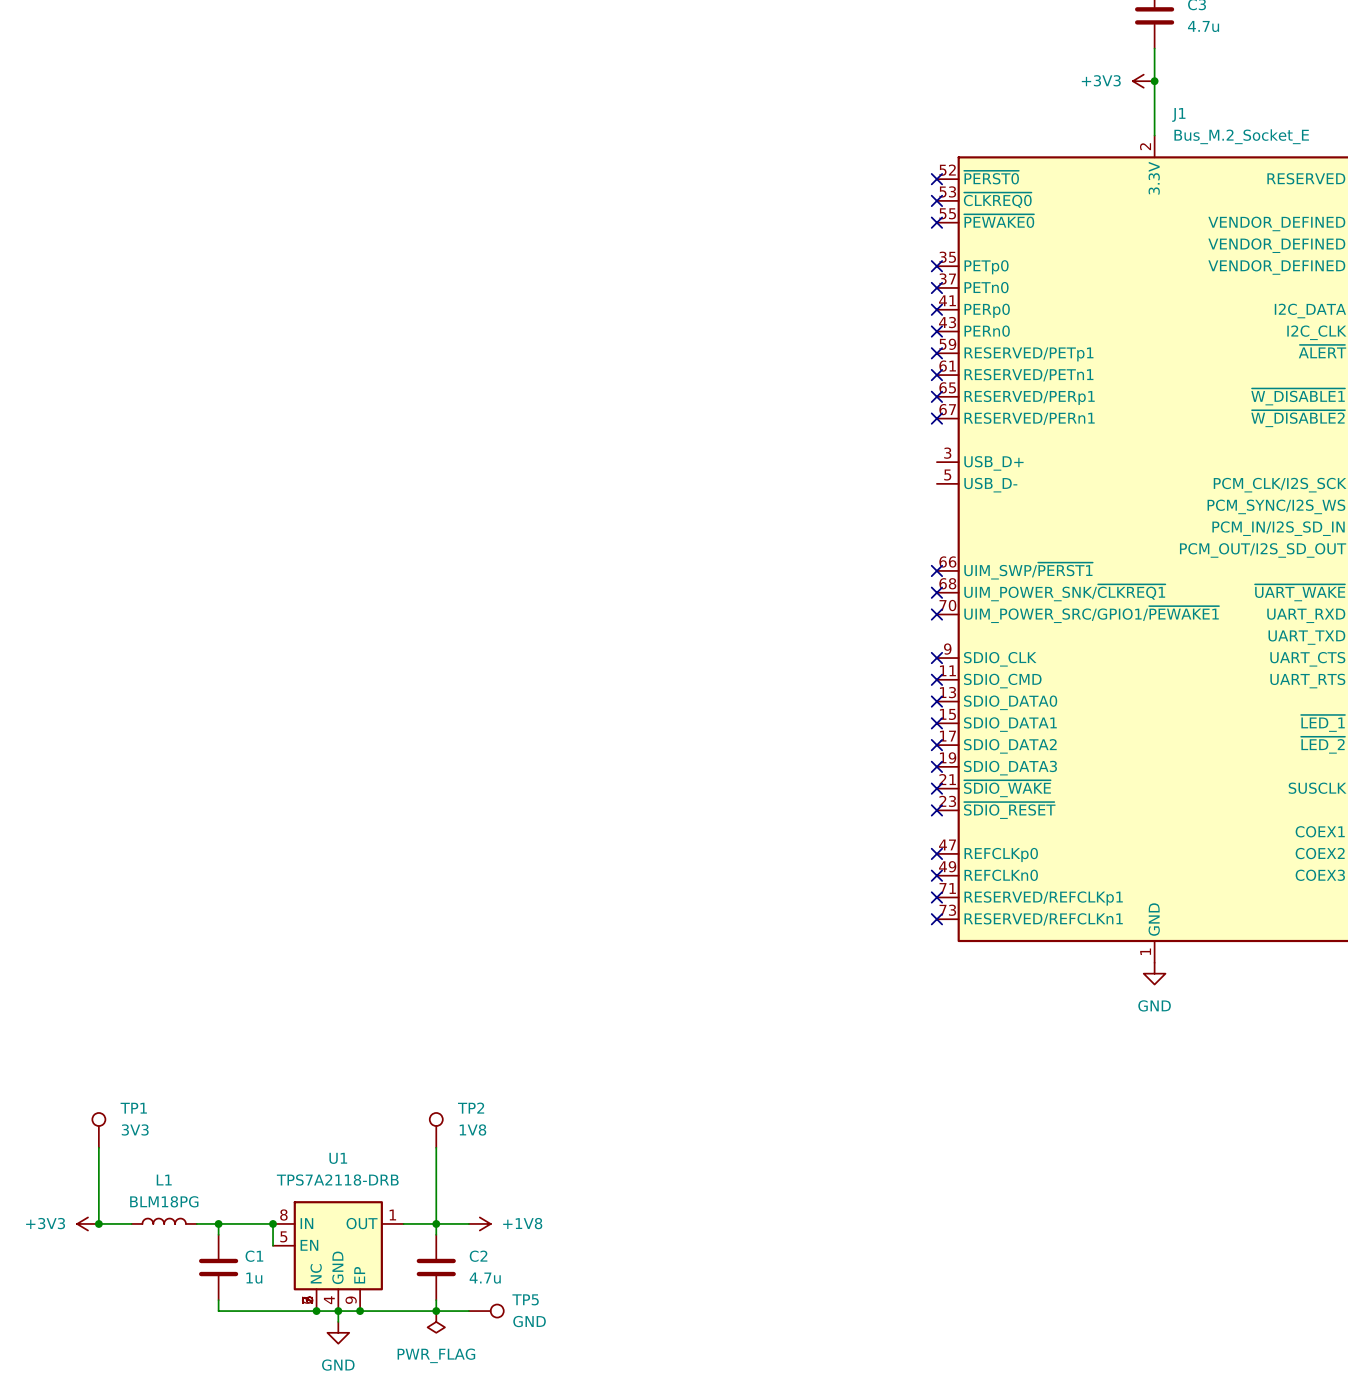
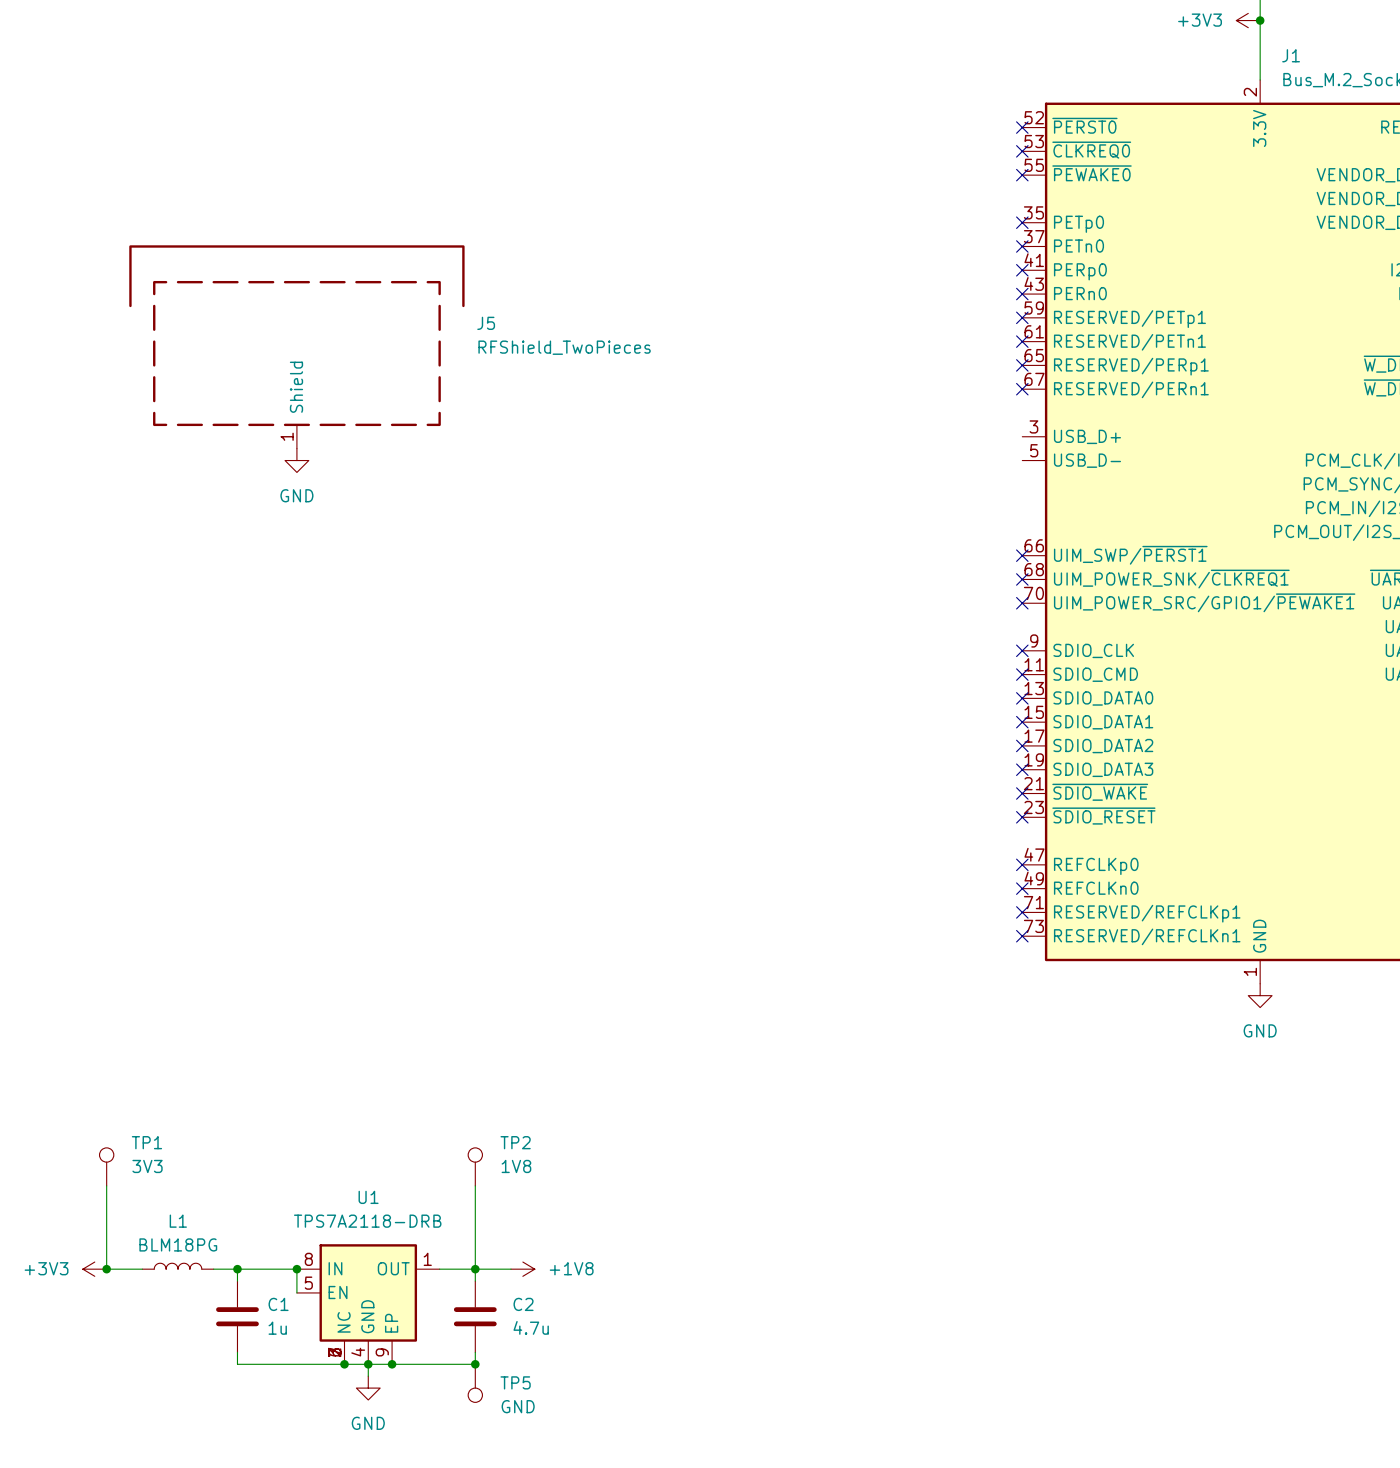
J5: none -> RFShield_TwoPieces (296, 346)
power symbol: none -> GND (296, 460)
wire: (436, 1311) (468, 1311) -> none
TP5 position: (486, 1311) -> (475, 1383)
TP5 rotation: 0° (497, 1311) -> 90° clockwise (475, 1395)
power symbol: PWR_FLAG (436, 1321) -> none

